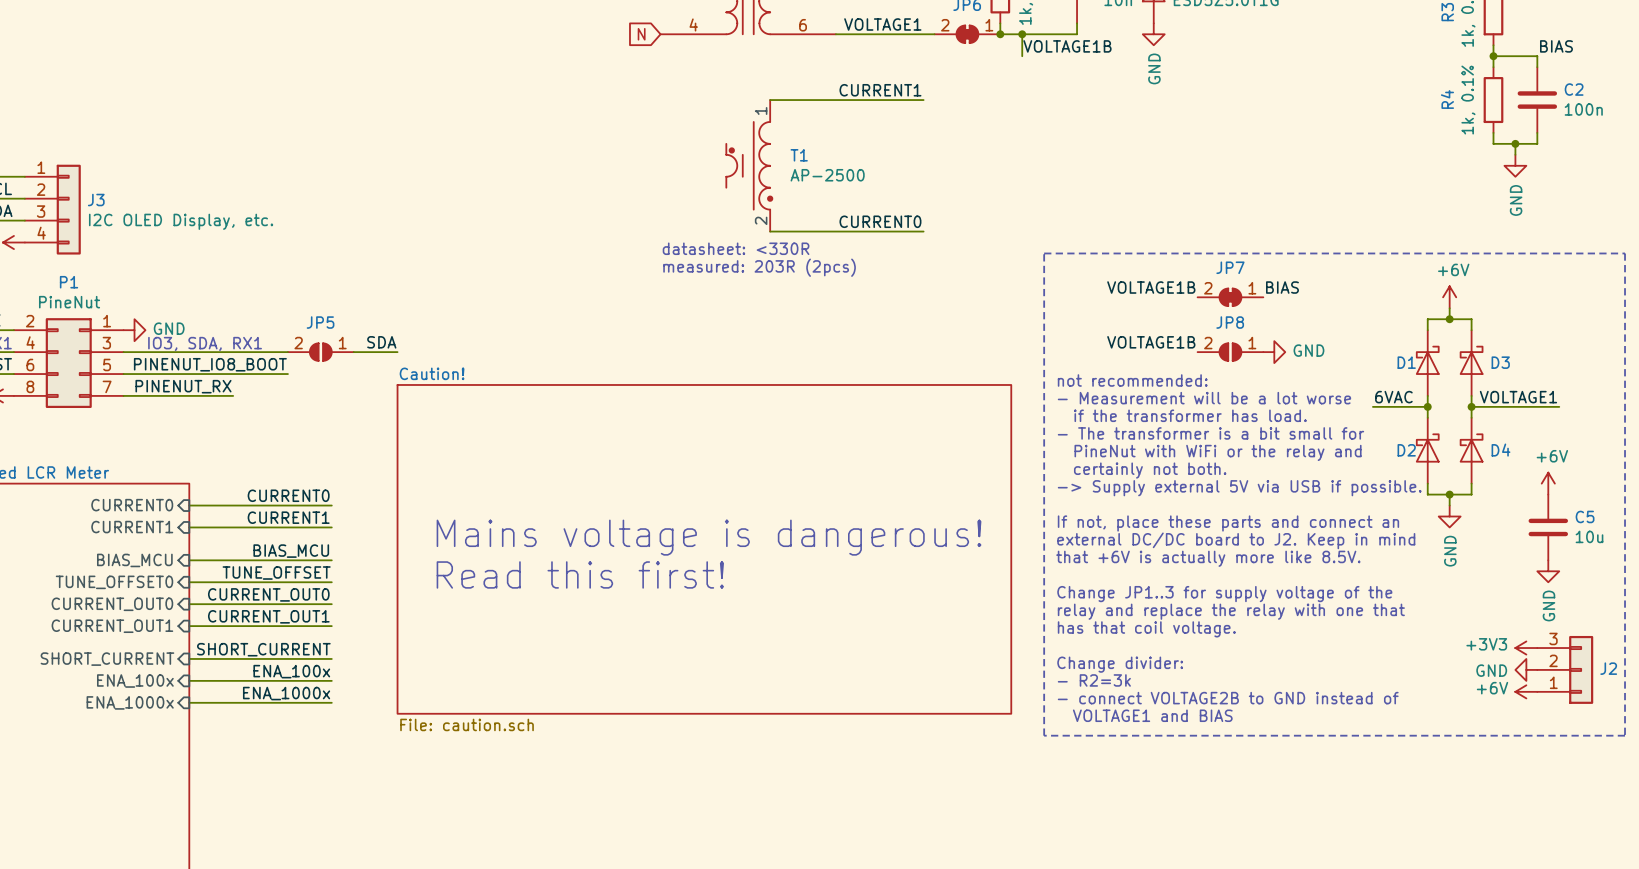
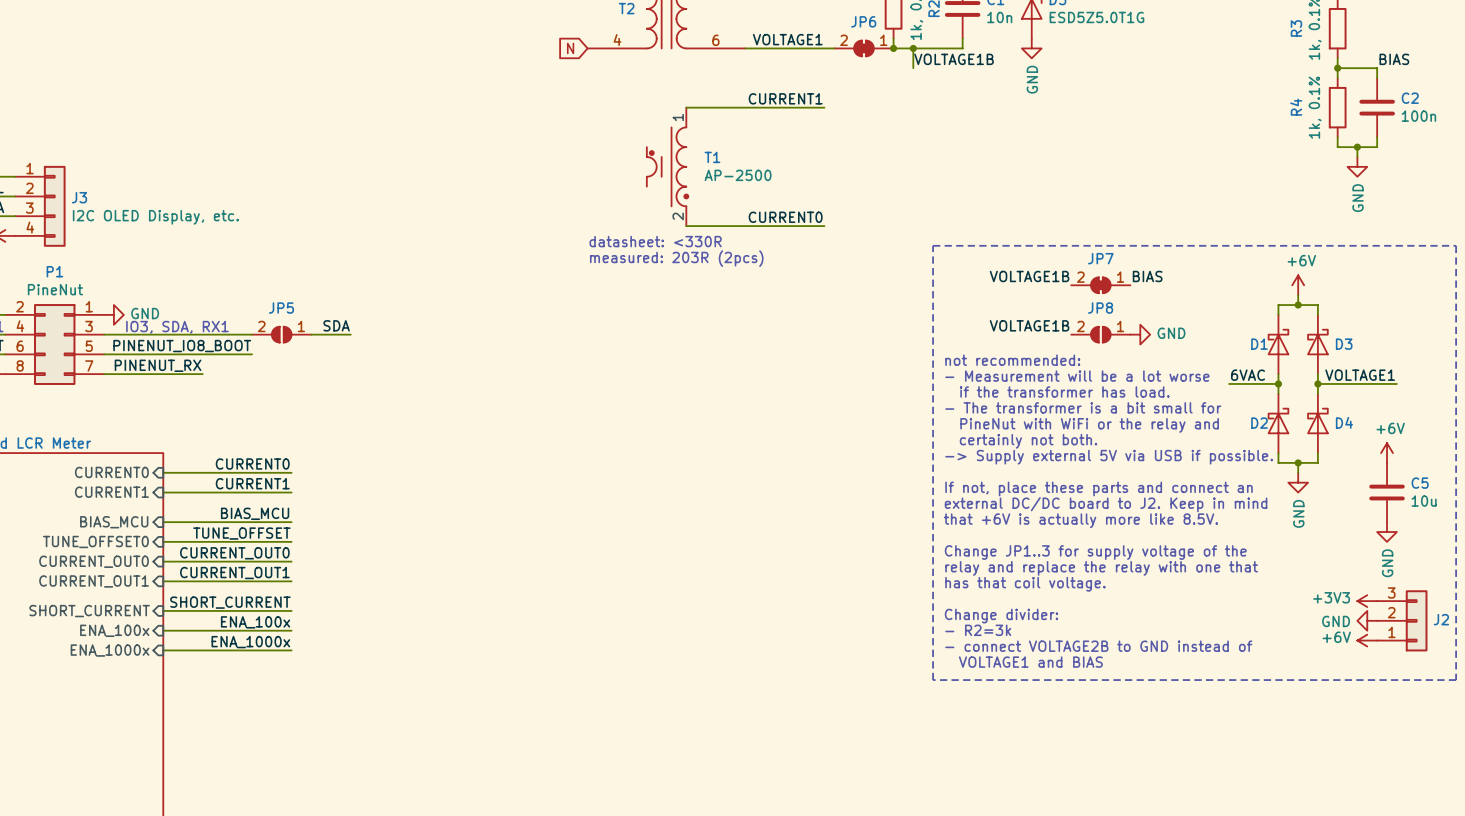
text: Mains voltage is dangerous! (709, 537) -> none
sheet Caution!: File: caution.sch (704, 549) -> none
text: Read this first! (580, 574) -> none

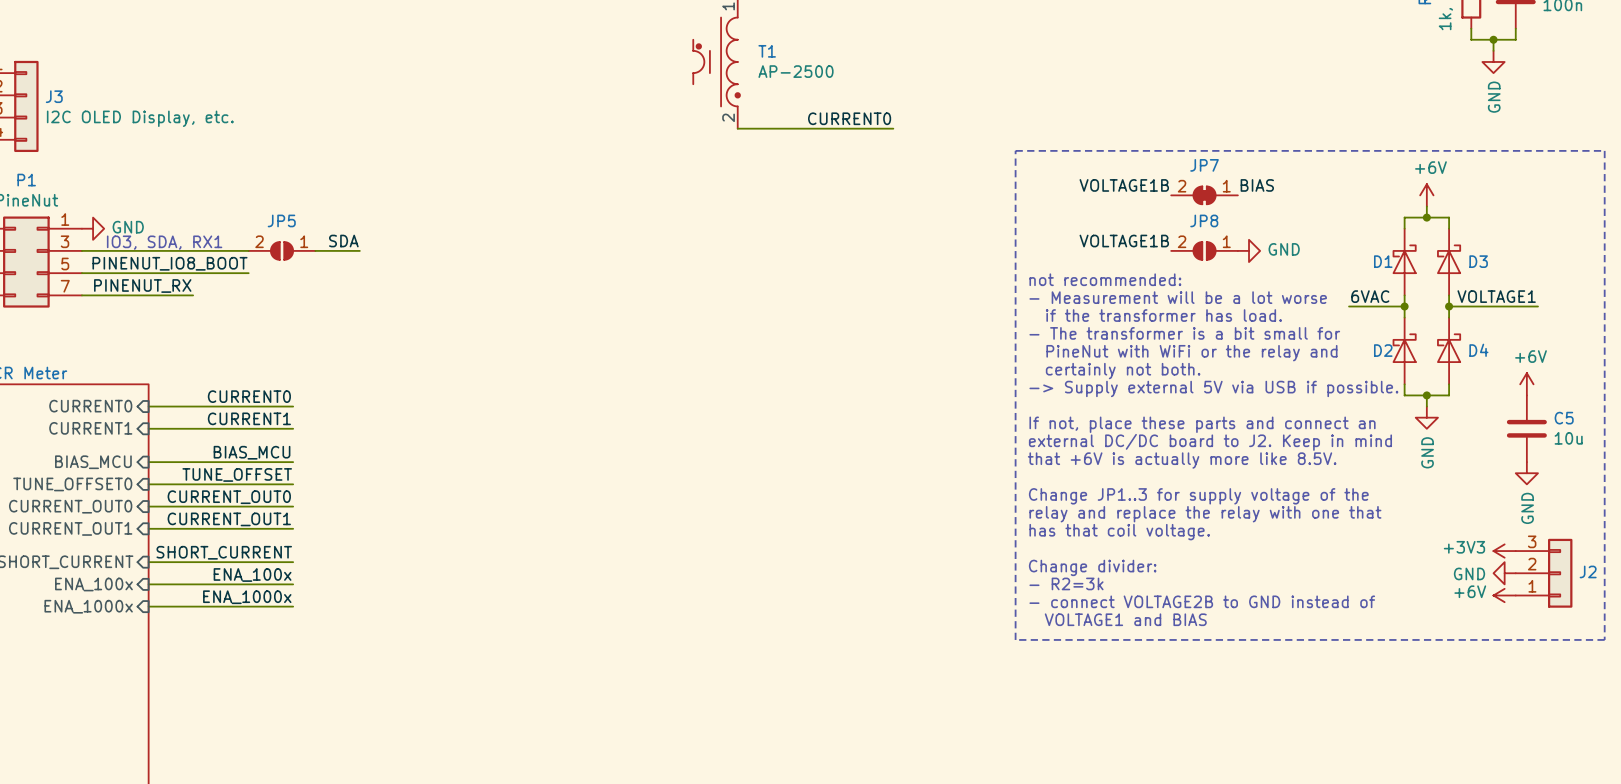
text: datasheet: <330R (655, 241) -> none
text: measured: 203R (2pcs) (676, 258) -> none

